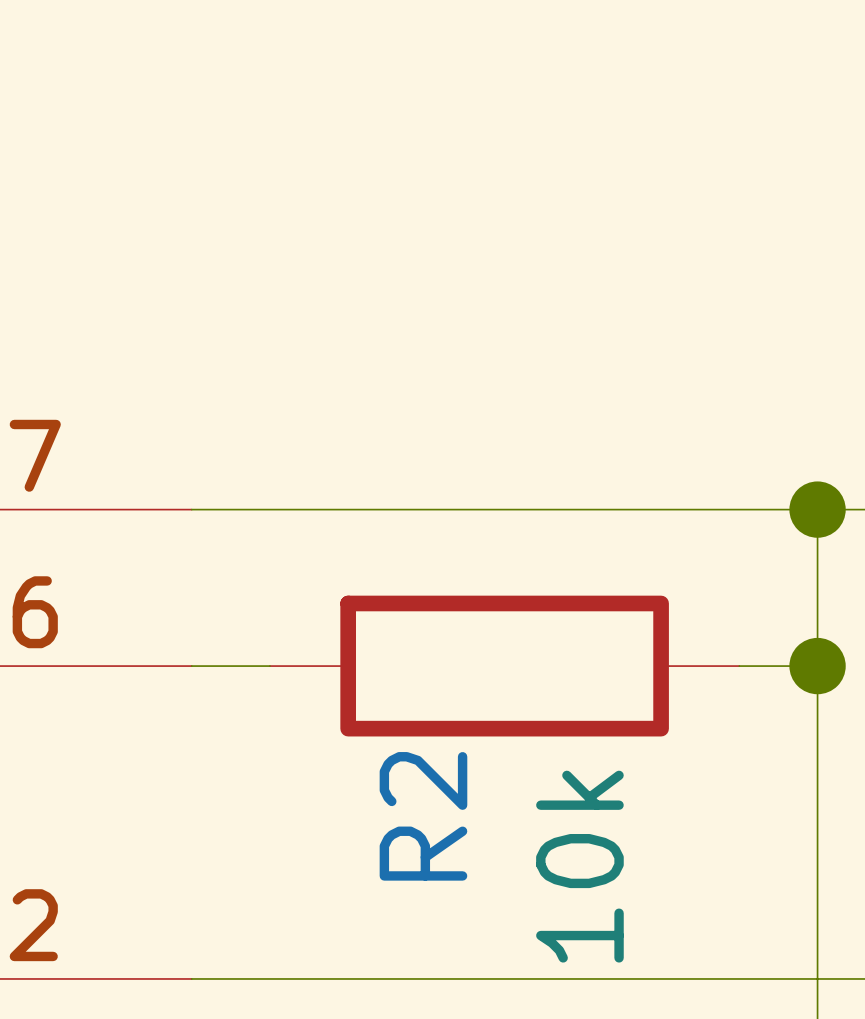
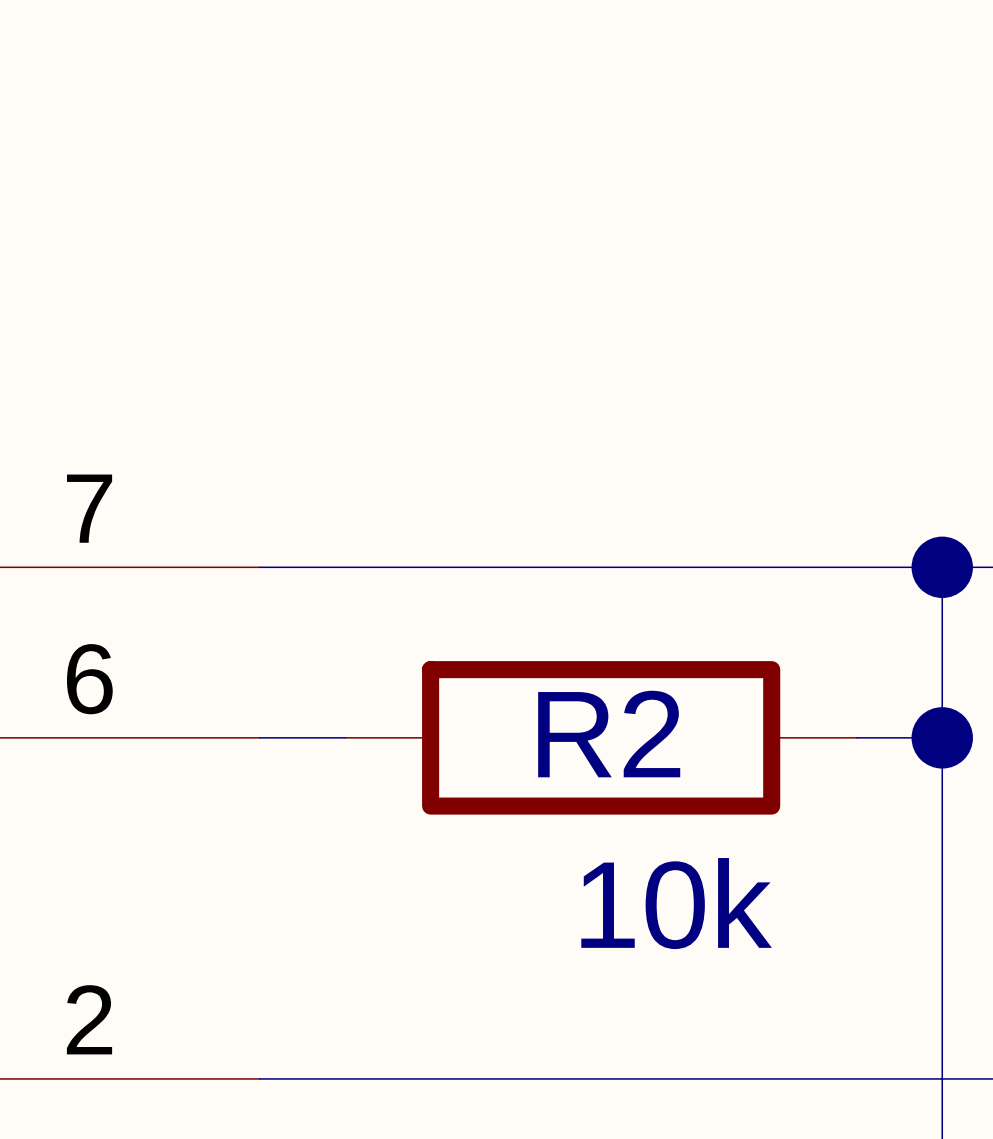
R2 name rotation: 0° (423, 816) -> 90° clockwise (609, 734)
R2 value rotation: 0° (579, 866) -> 90° clockwise (676, 903)

